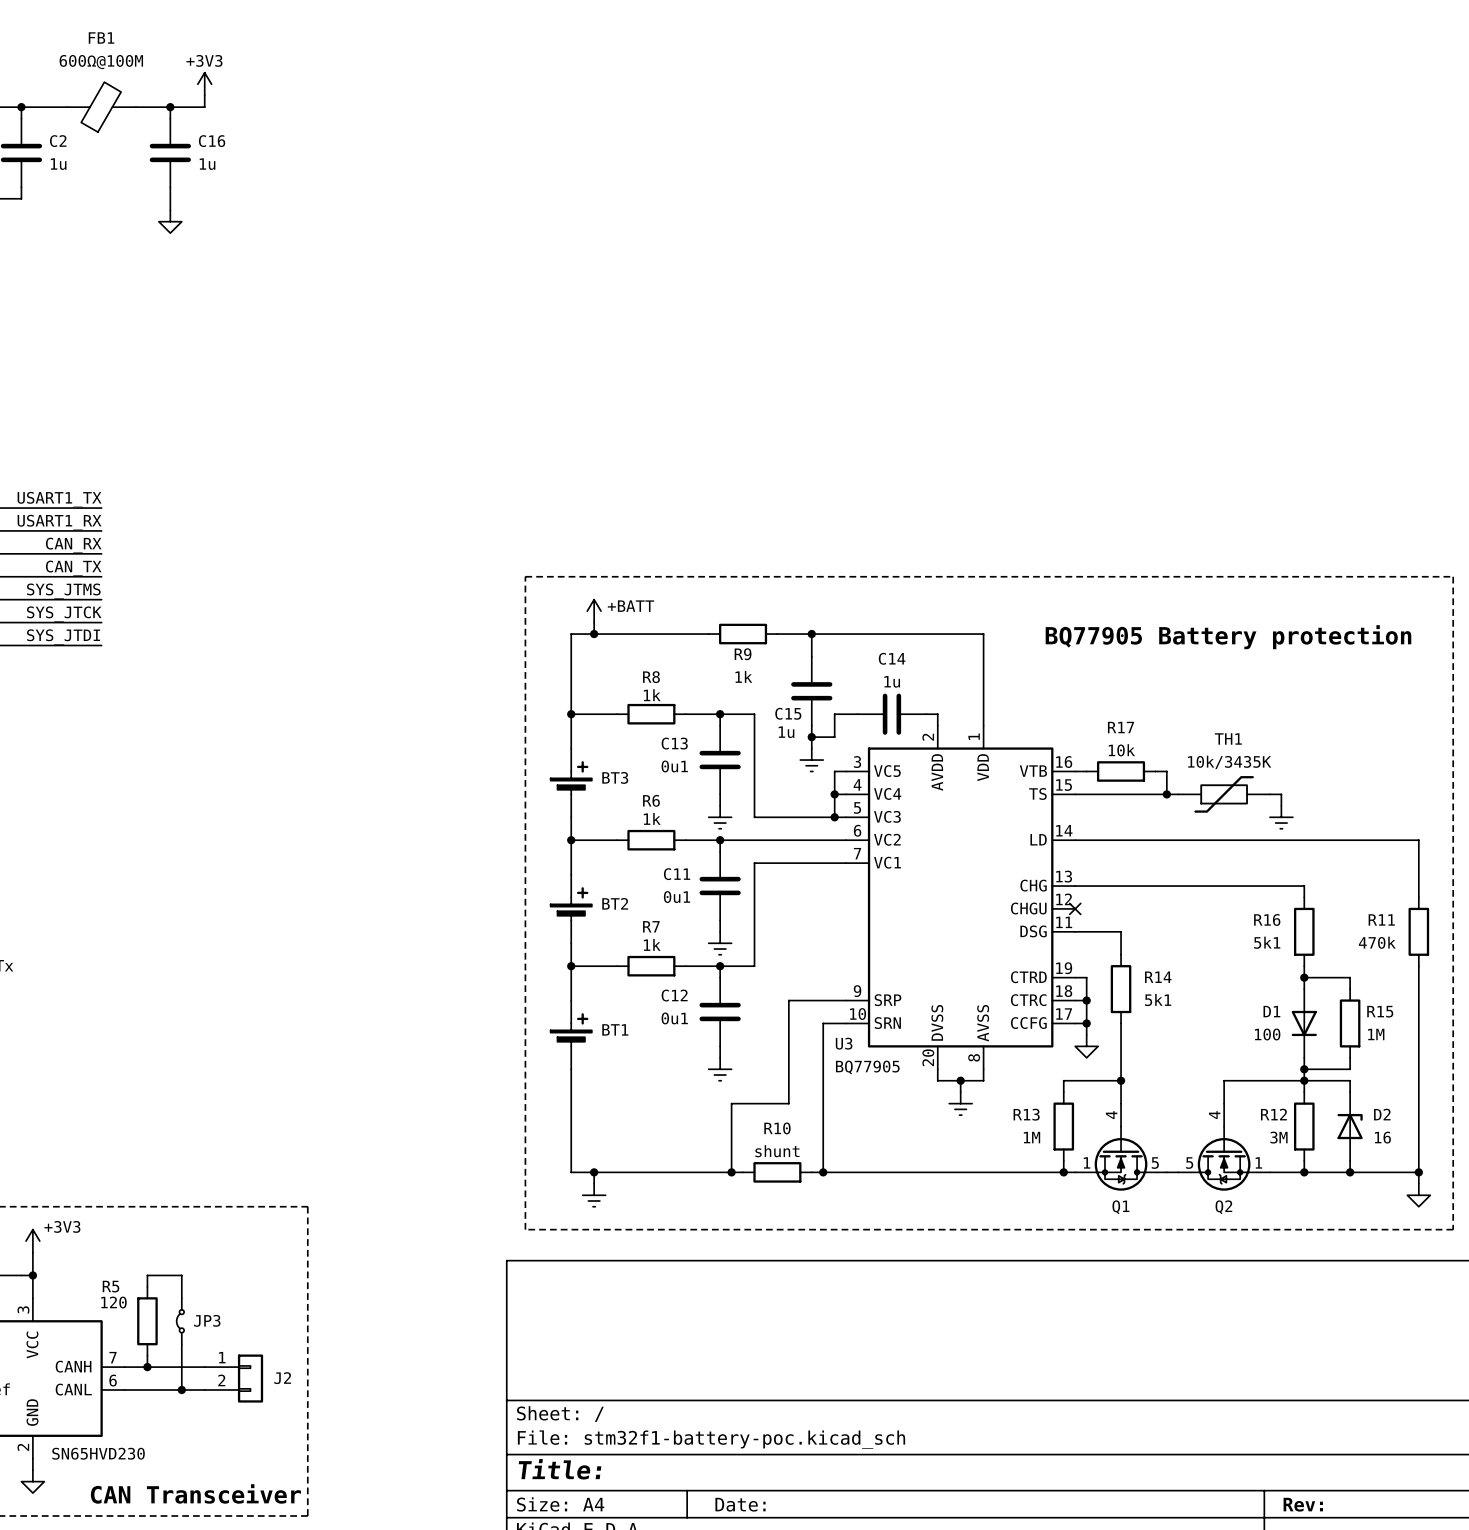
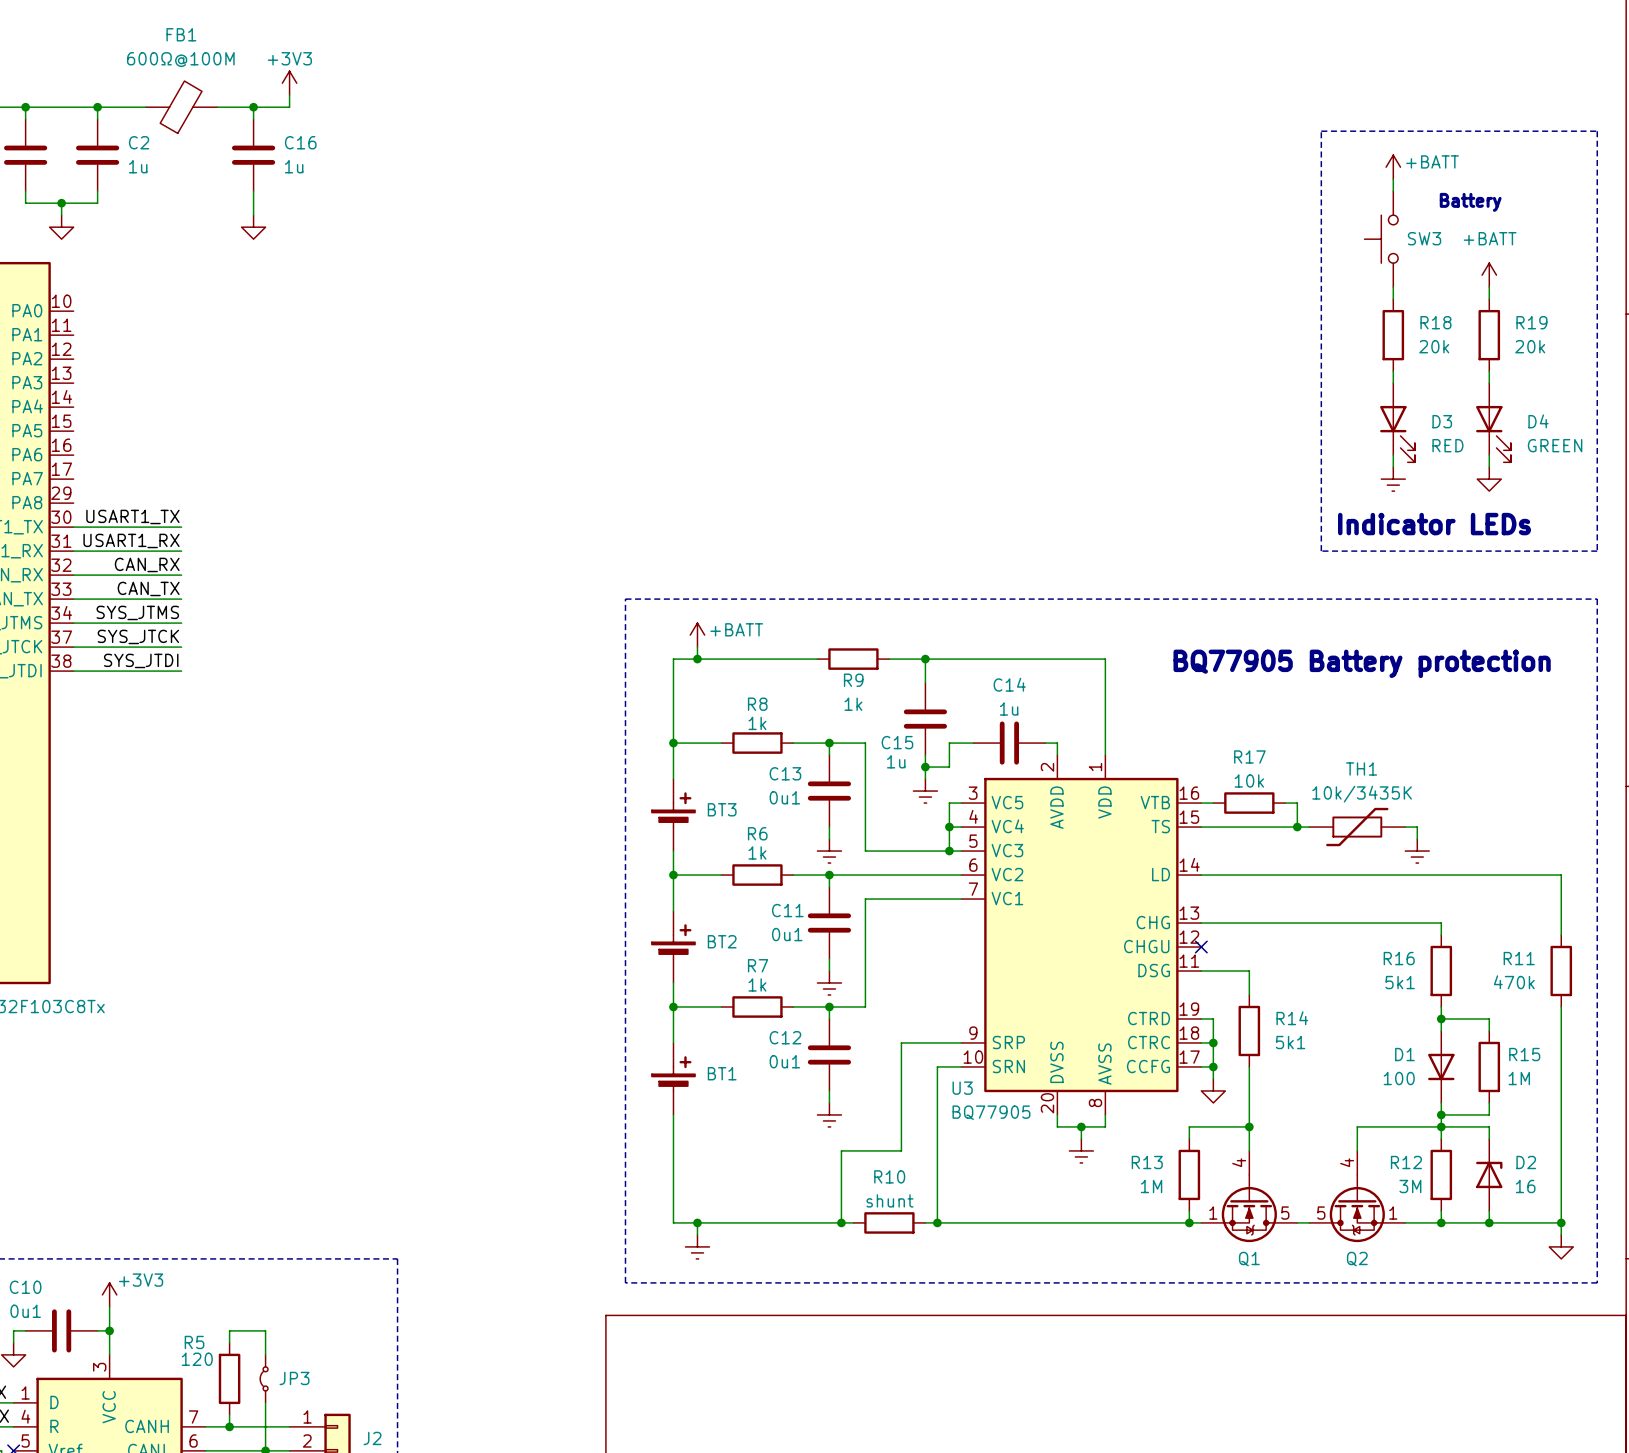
line: none -> (1321, 131) (1597, 131) (1597, 551) (1321, 551) (1321, 131)
power symbol: none -> +BATT (1393, 167)
wire: none -> (1393, 179) (1393, 191)
text: none -> Battery (1470, 202)
SW3: none -> (1381, 239)
power symbol: none -> +BATT (1489, 275)
wire: none -> (1393, 287) (1393, 299)
wire: none -> (1489, 287) (1489, 299)
R18: none -> 20k (1393, 335)
R19: none -> 20k (1489, 335)
wire: none -> (1393, 371) (1393, 383)
wire: none -> (1489, 371) (1489, 383)
D3: none -> RED (1397, 422)
D4: none -> GREEN (1493, 422)
wire: none -> (1393, 455) (1393, 467)
wire: none -> (1489, 455) (1489, 467)
power symbol: none -> (1393, 479)
power symbol: none -> (1489, 479)
text: none -> Indicator LEDs (1434, 524)

